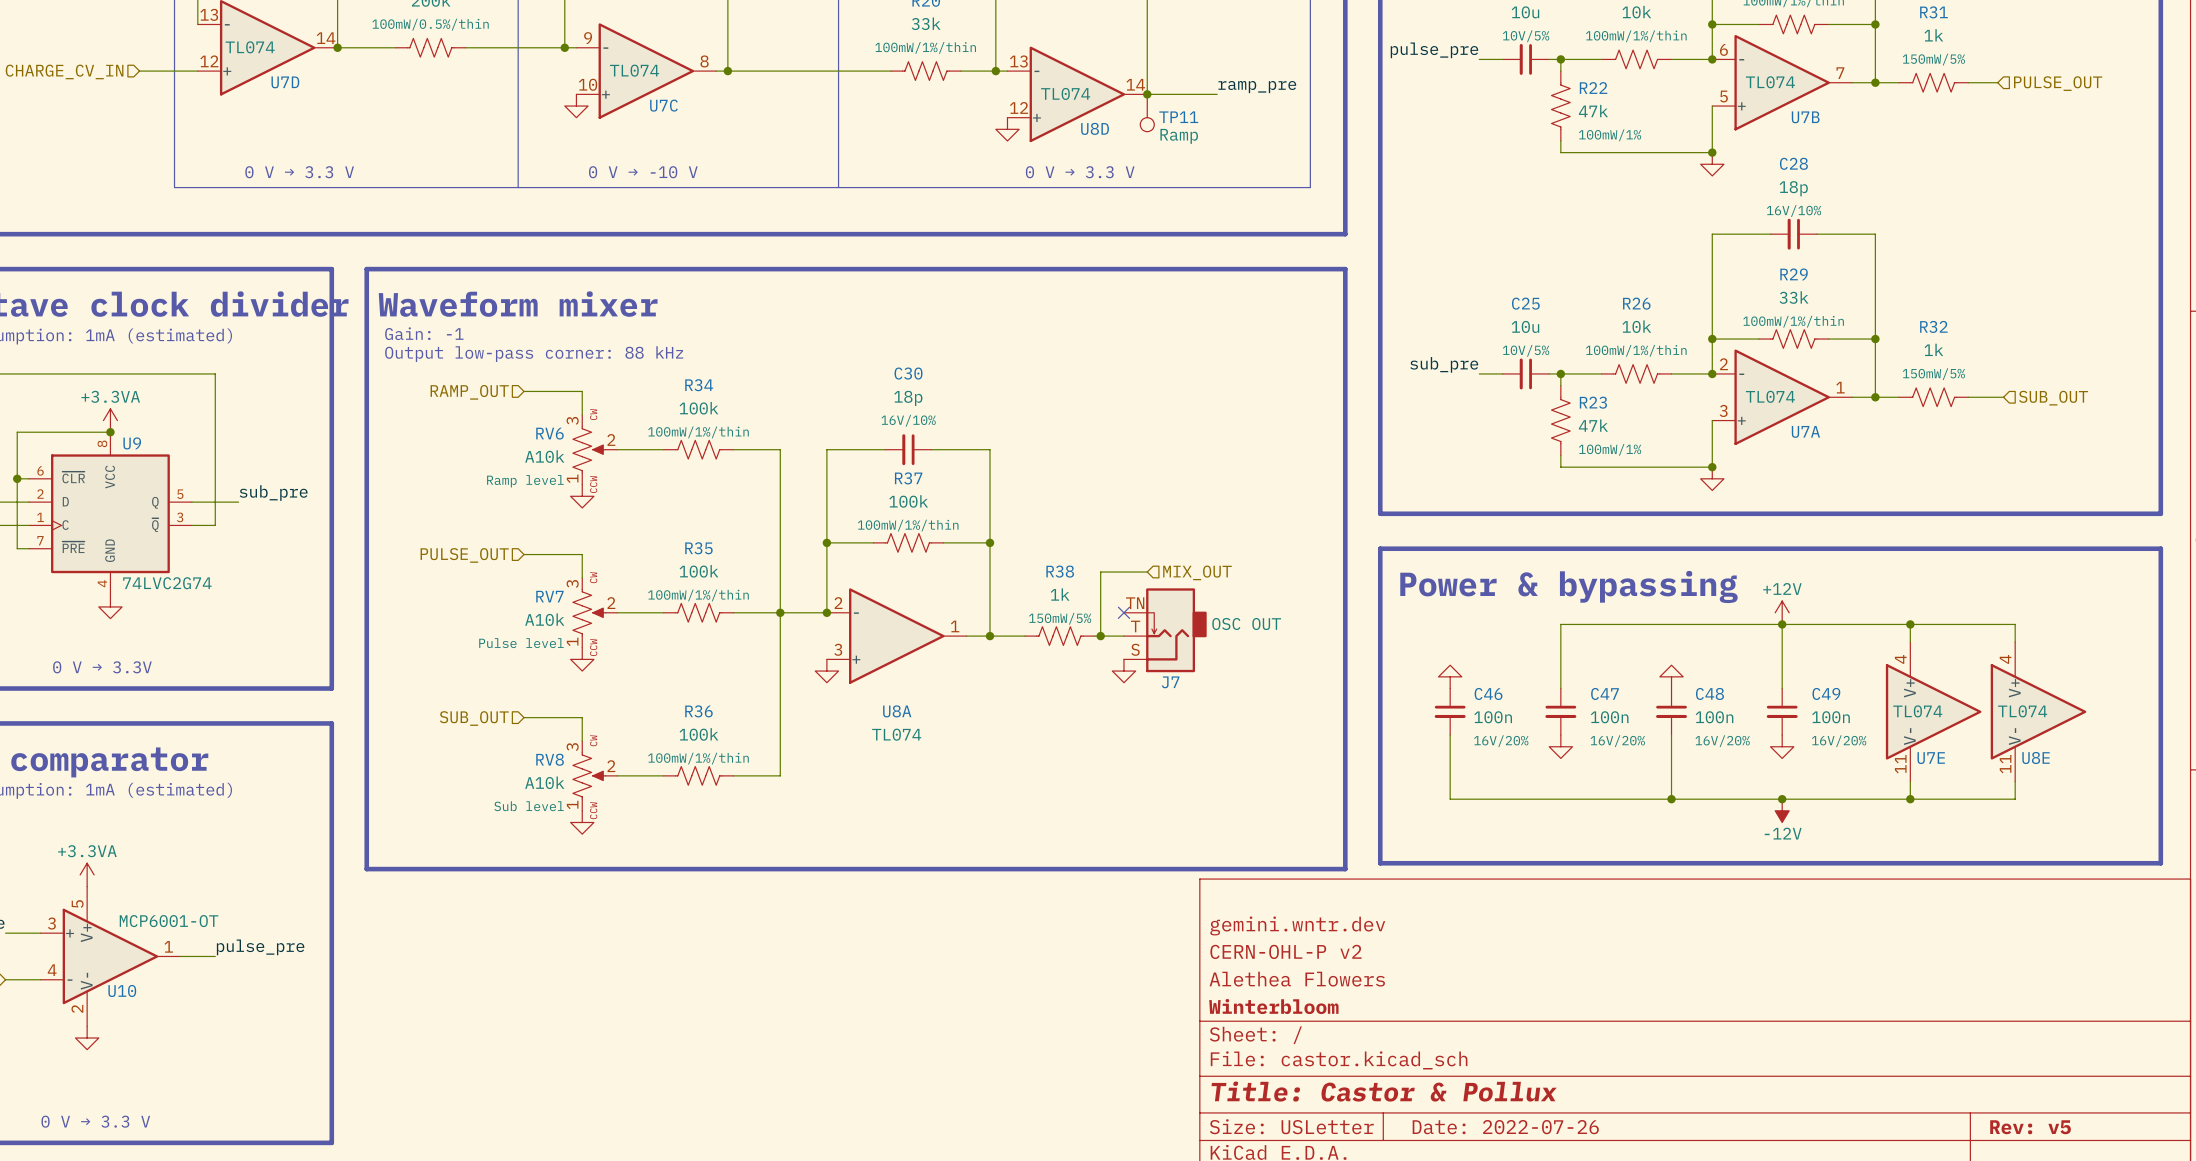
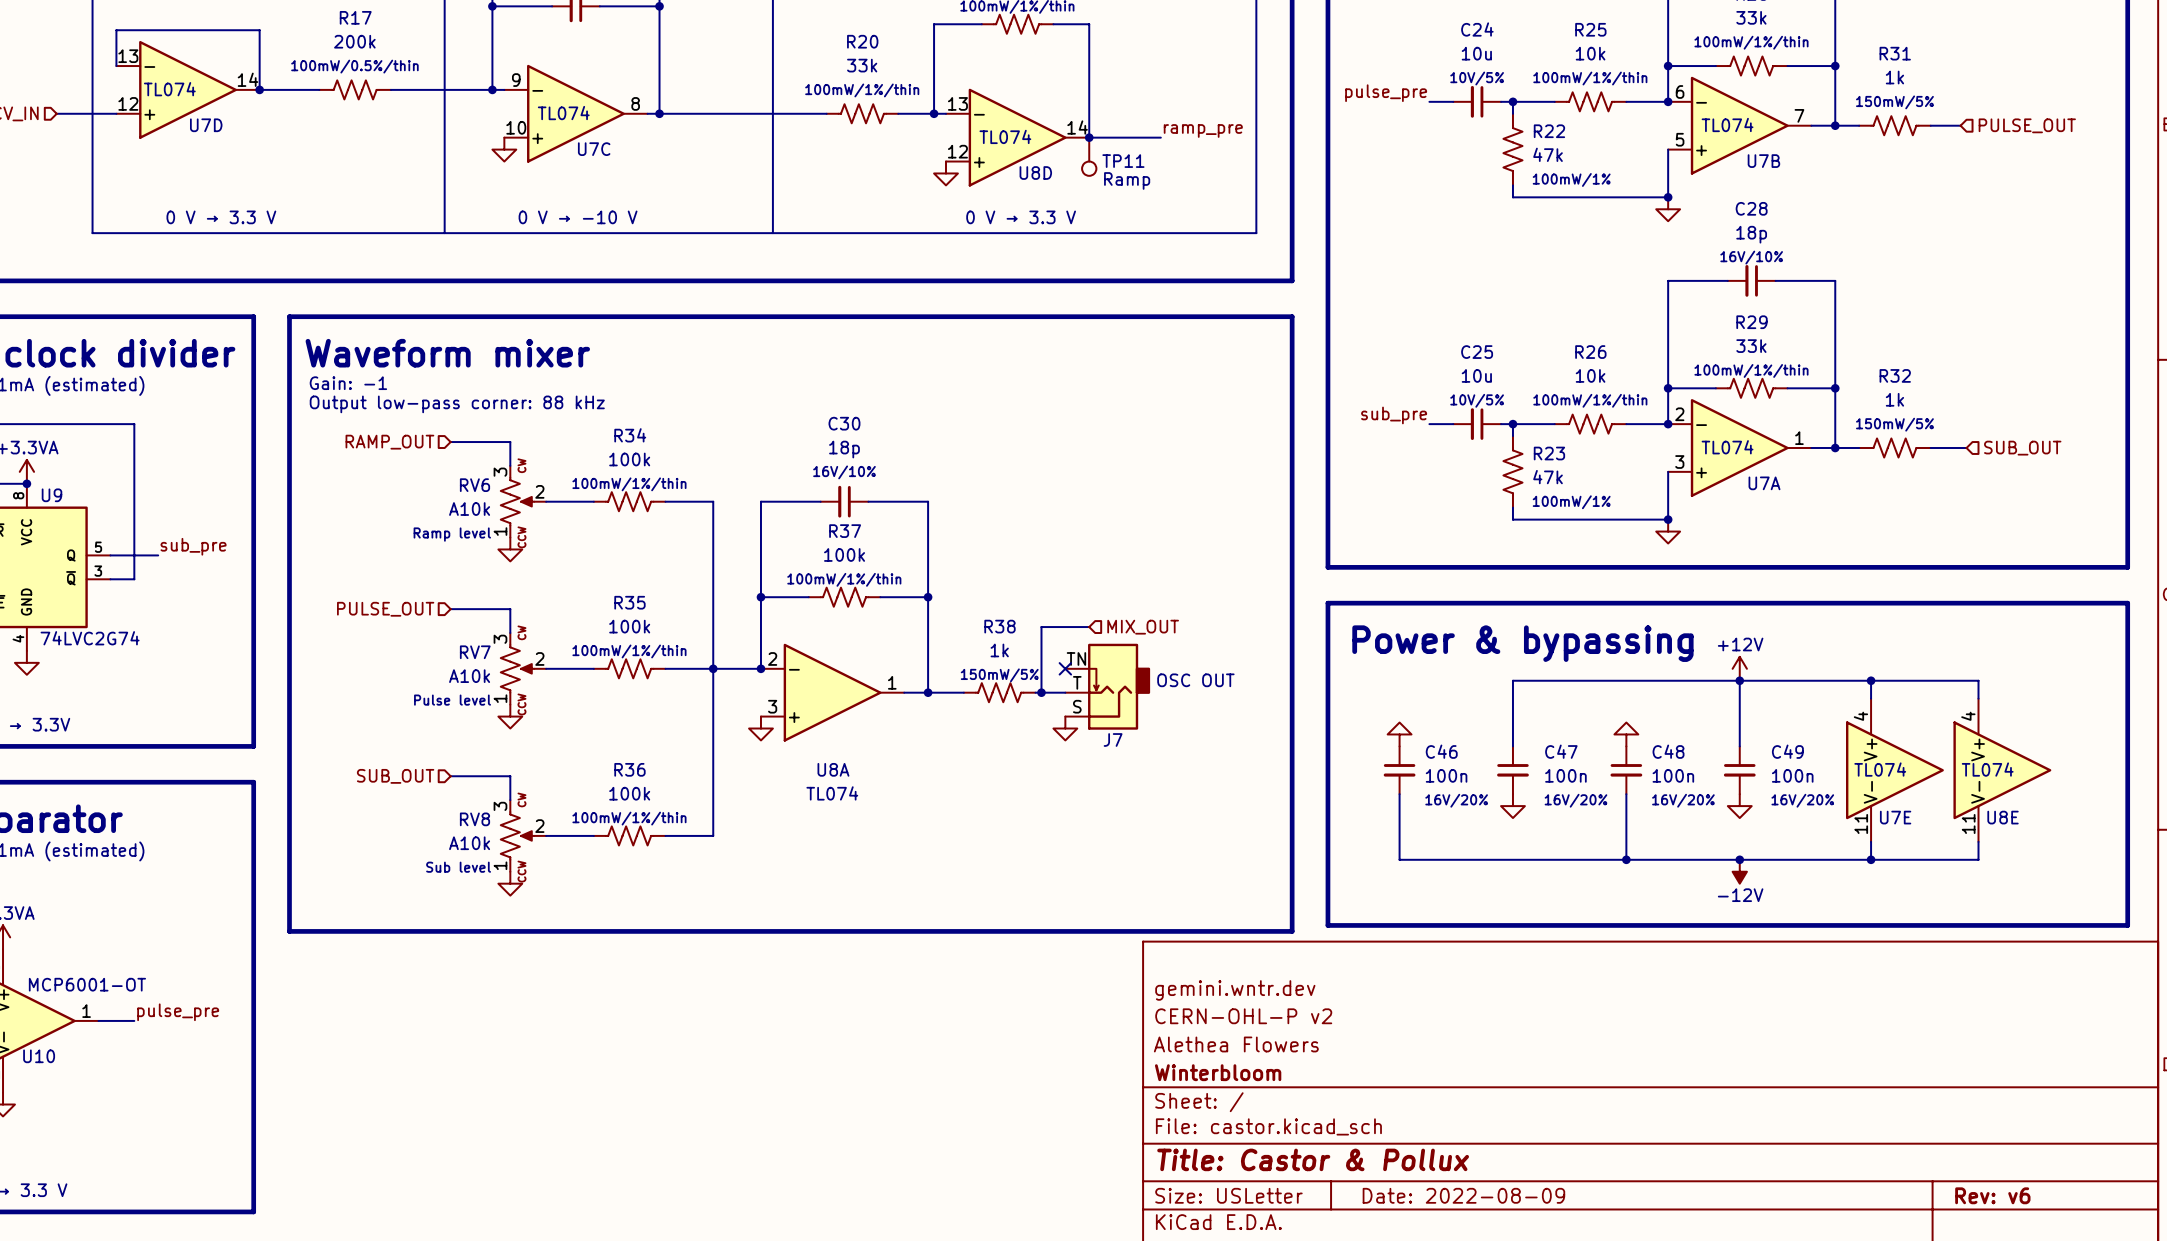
title block: Date: 2022-07-26 (1505, 1127) -> Date: 2022-08-09 (1463, 1195)
title block: Rev: v5 (2030, 1127) -> Rev: v6 (1992, 1195)

